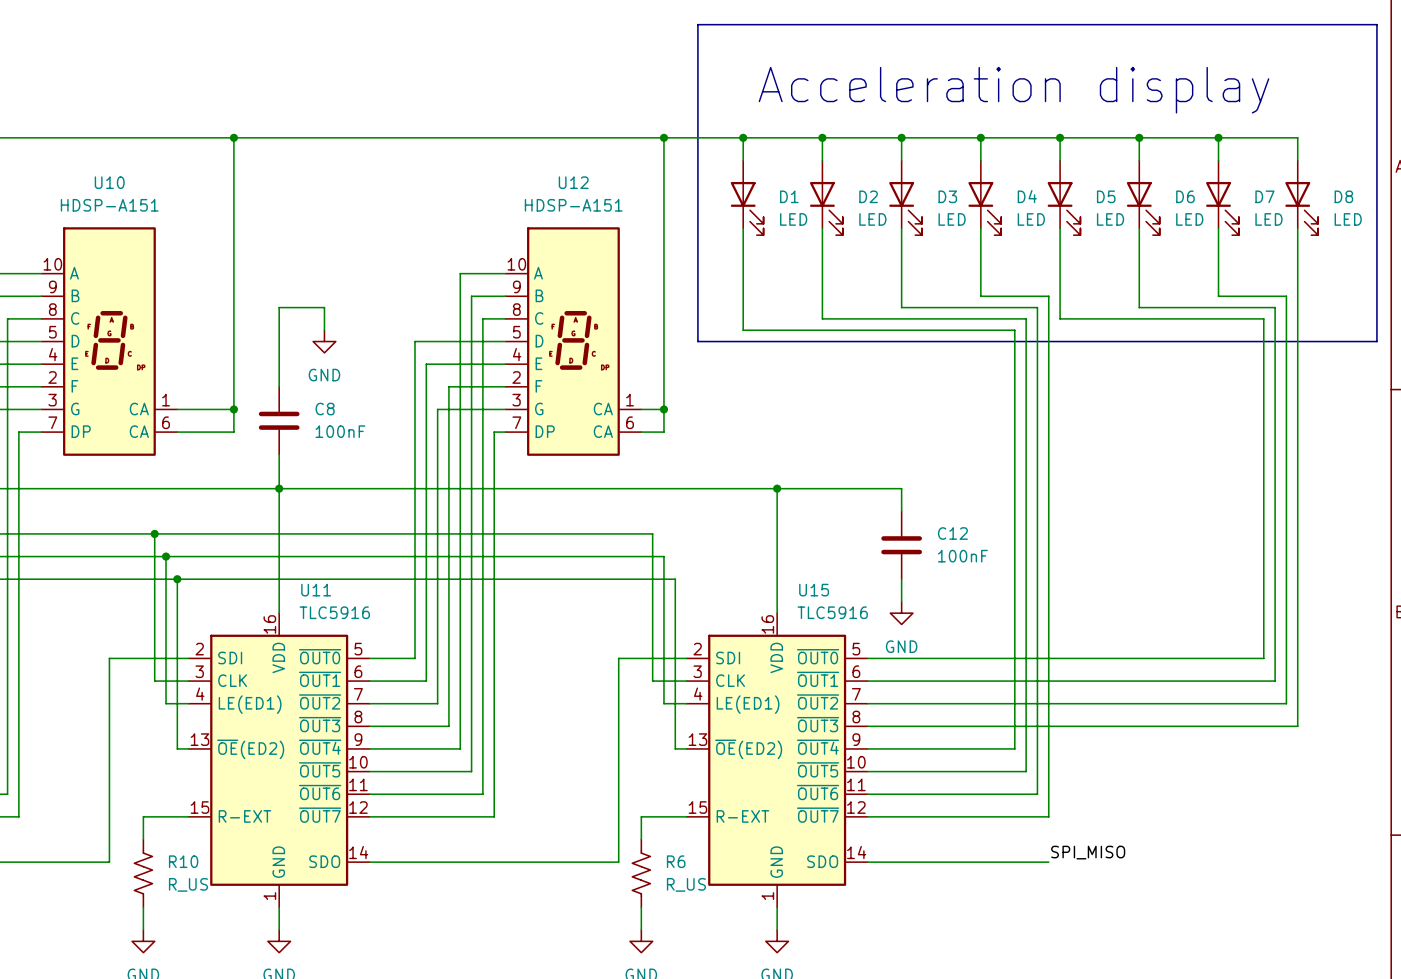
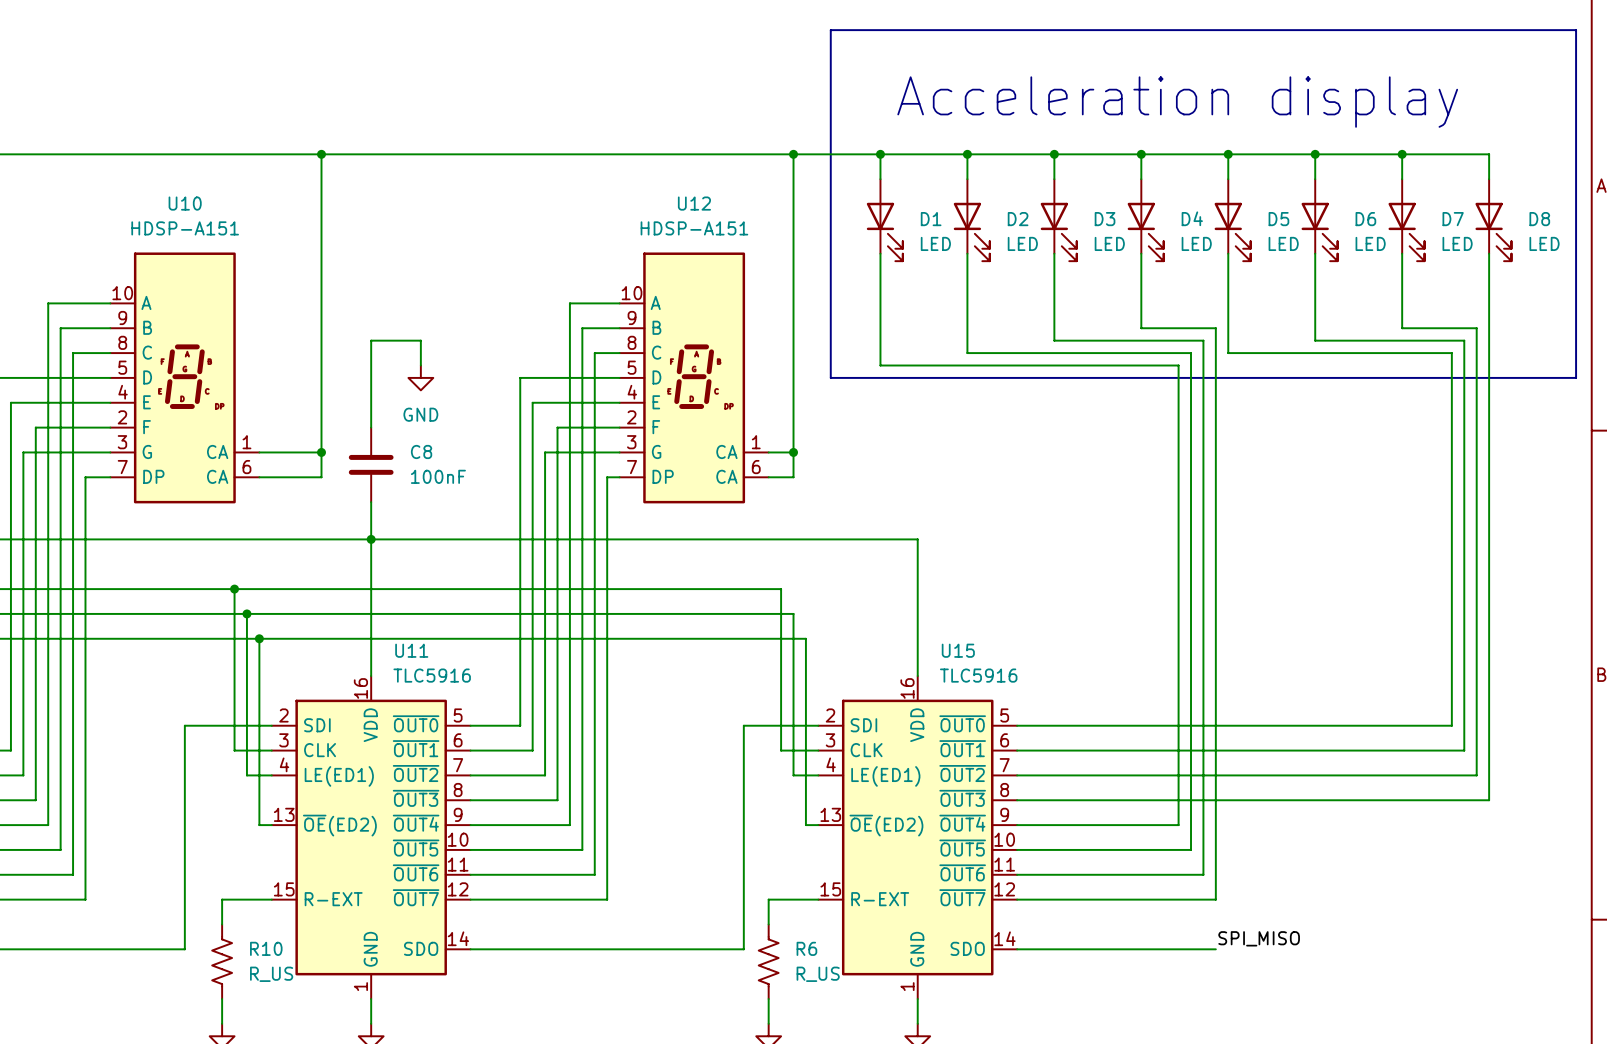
wire: (777, 488) (901, 488) (901, 511) -> none
junction: (777, 488) -> none
C12: 100nF (901, 545) -> none
wire: (901, 579) (901, 601) -> none
power symbol: GND (901, 613) -> none

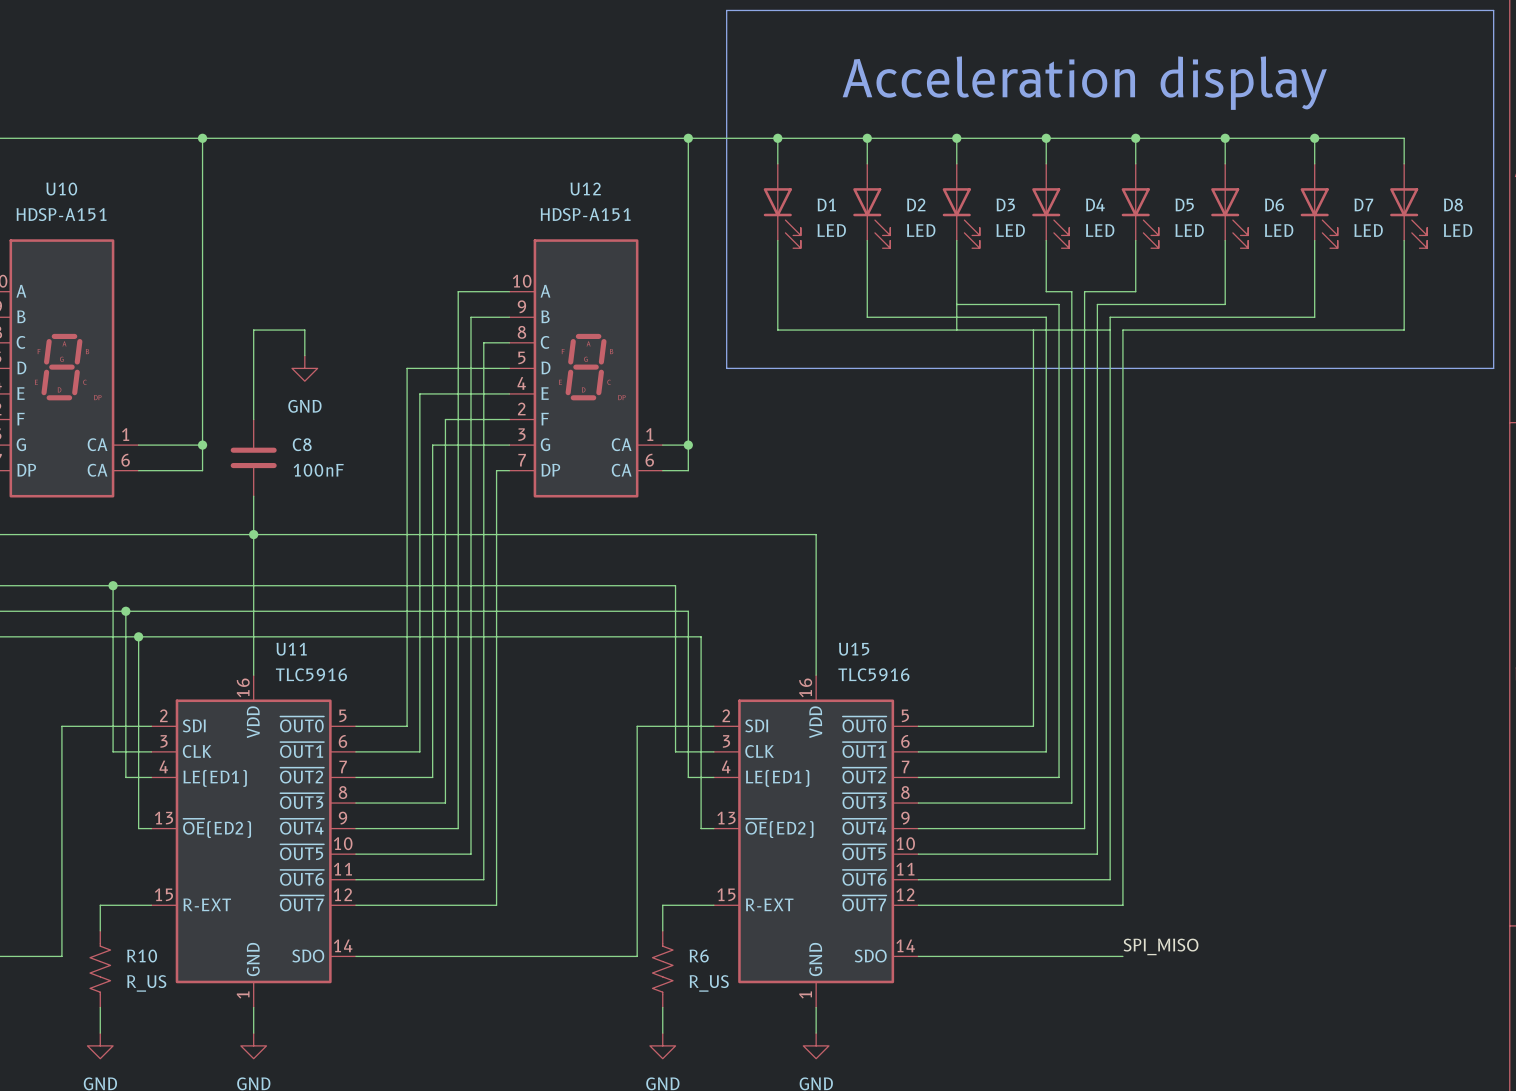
wire: (1141, 303) (1141, 328) (1203, 328) -> (1110, 330) (1110, 317)
wire: (1228, 303) (1228, 353) (1451, 353) (1451, 725) (1128, 725) -> (1033, 330) (1033, 726)
wire: none -> (1135, 291) (1084, 291) (1084, 355)
wire: (1315, 315) (1315, 340) -> (1225, 304) (1097, 304) (1097, 342)
wire: (967, 328) (967, 353) (1191, 353) -> (867, 317) (1046, 317) (1046, 751)
wire: (1215, 328) (1215, 340) -> (1225, 330) (1122, 330)
wire: none -> (1122, 317) (1314, 317)
wire: (1402, 328) (1476, 328) (1476, 775) (1153, 775) -> (956, 304) (1059, 304) (1059, 777)
wire: (880, 340) (880, 365) (1178, 365) -> (777, 330) (956, 330)
wire: (1464, 340) (1464, 750) (1141, 750) -> (1378, 330) (1404, 330)
wire: (1489, 340) (1489, 800) (1166, 800) -> (1046, 291) (1071, 291) (1071, 803)

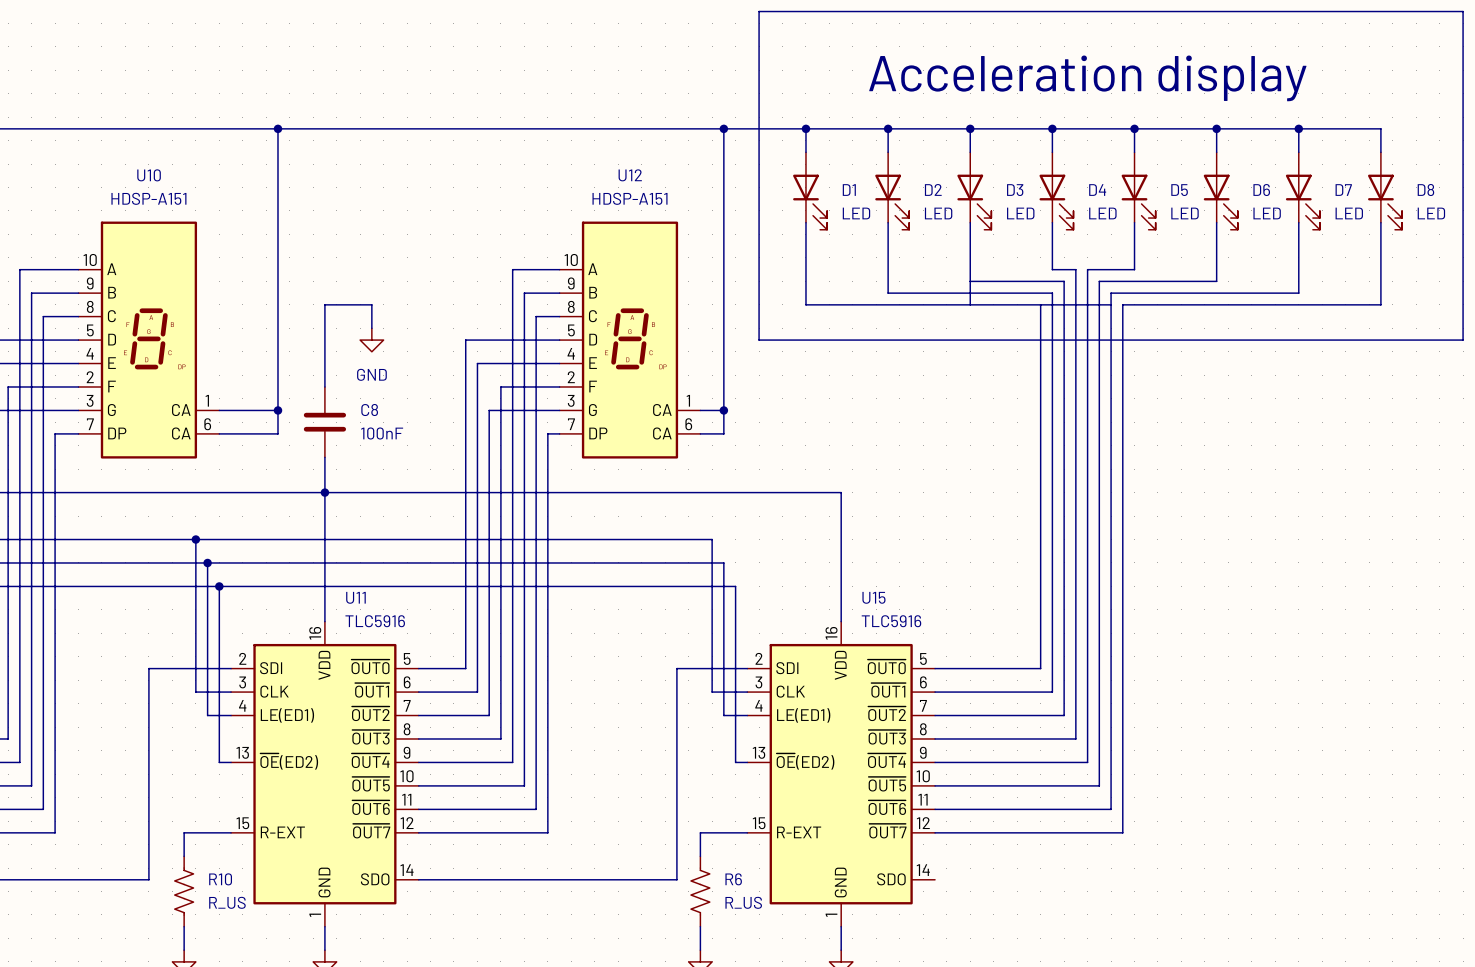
label: SPI_MISO (1161, 946) -> none
wire: (918, 956) (1122, 956) -> none

